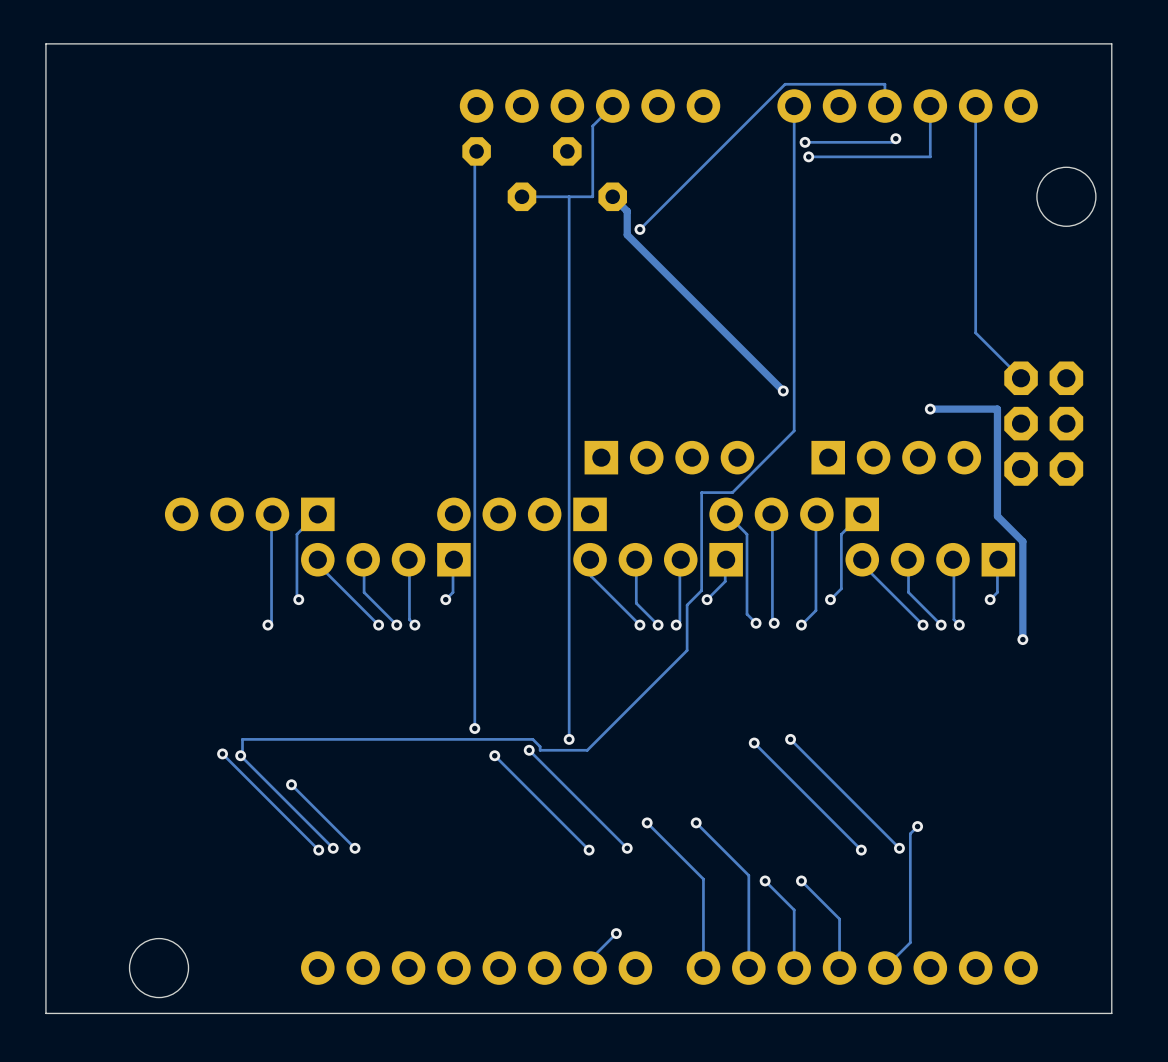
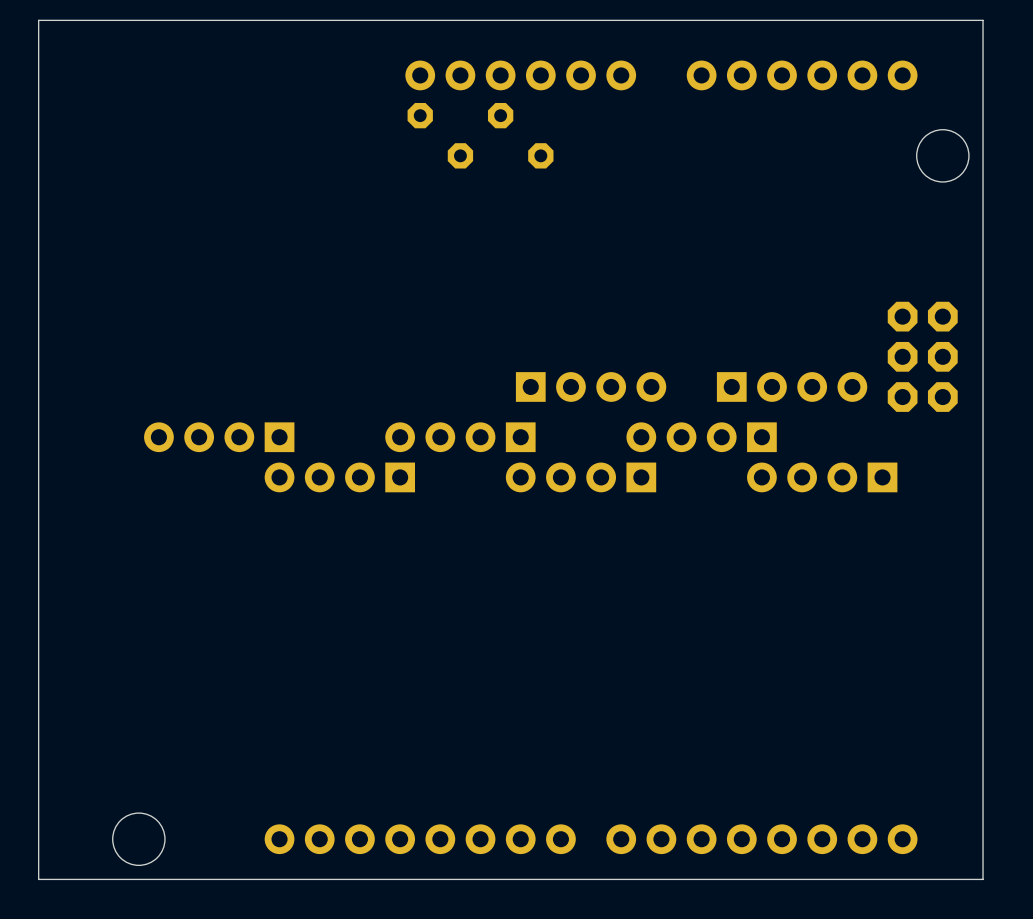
track: (612, 106) (592, 126) (592, 196) (521, 196) -> none
track: (794, 106) (794, 430) (732, 492) (701, 492) (701, 590) (687, 605) (687, 650) (587, 750) (540, 750) (540, 746) (532, 739) (242, 739) (242, 755) (240, 755) (333, 848) -> none
track: (884, 106) (884, 84) (785, 84) (639, 229) -> none
track: (930, 106) (930, 156) (808, 156) -> none
track: (975, 106) (975, 332) (1021, 378) -> none
track: (895, 138) (895, 142) (805, 142) -> none
via: (895, 138) -> none
via: (805, 142) -> none
track: (476, 151) (474, 153) (474, 728) -> none
via: (808, 156) -> none
track: (569, 196) (569, 739) -> none
track: (612, 196) (627, 211) (627, 234) (783, 390) -> none
via: (639, 229) -> none
via: (783, 390) -> none
track: (930, 409) (997, 409) (997, 516) (1022, 541) (1022, 639) -> none
via: (930, 409) -> none
track: (272, 514) (271, 621) (267, 625) -> none
track: (317, 514) (296, 534) (296, 597) (298, 599) -> none
track: (726, 514) (747, 534) (747, 614) (756, 623) -> none
track: (771, 514) (772, 621) (774, 623) -> none
track: (816, 514) (815, 610) (801, 625) -> none
track: (862, 514) (841, 534) (841, 588) (830, 599) -> none
track: (317, 559) (318, 565) (378, 625) -> none
track: (363, 559) (364, 592) (396, 625) -> none
track: (408, 559) (409, 619) (414, 625) -> none
track: (453, 559) (453, 592) (445, 599) -> none
track: (590, 559) (590, 576) (639, 625) -> none
track: (635, 559) (636, 603) (658, 625) -> none
track: (680, 559) (679, 621) (676, 625) -> none
track: (726, 559) (725, 581) (707, 599) -> none
track: (862, 559) (863, 565) (923, 625) -> none
track: (907, 559) (908, 592) (941, 625) -> none
track: (952, 559) (953, 619) (959, 625) -> none
track: (998, 559) (997, 592) (990, 599) -> none
via: (298, 599) -> none
via: (445, 599) -> none
via: (707, 599) -> none
via: (830, 599) -> none
via: (990, 599) -> none
via: (756, 623) -> none
via: (774, 623) -> none
via: (267, 625) -> none
via: (378, 625) -> none
via: (396, 625) -> none
via: (414, 625) -> none
via: (639, 625) -> none
via: (658, 625) -> none
via: (676, 625) -> none
via: (801, 625) -> none
via: (923, 625) -> none
via: (941, 625) -> none
via: (959, 625) -> none
via: (1022, 639) -> none
via: (474, 728) -> none
via: (569, 739) -> none
track: (790, 739) (899, 848) -> none
via: (790, 739) -> none
track: (754, 743) (861, 850) -> none
via: (754, 743) -> none
track: (529, 750) (627, 848) -> none
via: (529, 750) -> none
track: (222, 753) (318, 850) -> none
via: (222, 753) -> none
via: (240, 755) -> none
track: (494, 755) (589, 850) -> none
via: (494, 755) -> none
track: (291, 784) (355, 848) -> none
via: (291, 784) -> none
track: (647, 822) (703, 879) (703, 968) -> none
via: (647, 822) -> none
track: (696, 822) (748, 875) (748, 968) -> none
via: (696, 822) -> none
track: (917, 826) (910, 833) (910, 942) (884, 968) -> none
via: (917, 826) -> none
via: (333, 848) -> none
via: (355, 848) -> none
via: (627, 848) -> none
via: (899, 848) -> none
via: (318, 850) -> none
via: (589, 850) -> none
via: (861, 850) -> none
track: (765, 880) (794, 909) (794, 968) -> none
via: (765, 880) -> none
track: (801, 880) (839, 919) (839, 968) -> none
via: (801, 880) -> none
track: (616, 933) (590, 958) (590, 968) -> none
via: (616, 933) -> none

